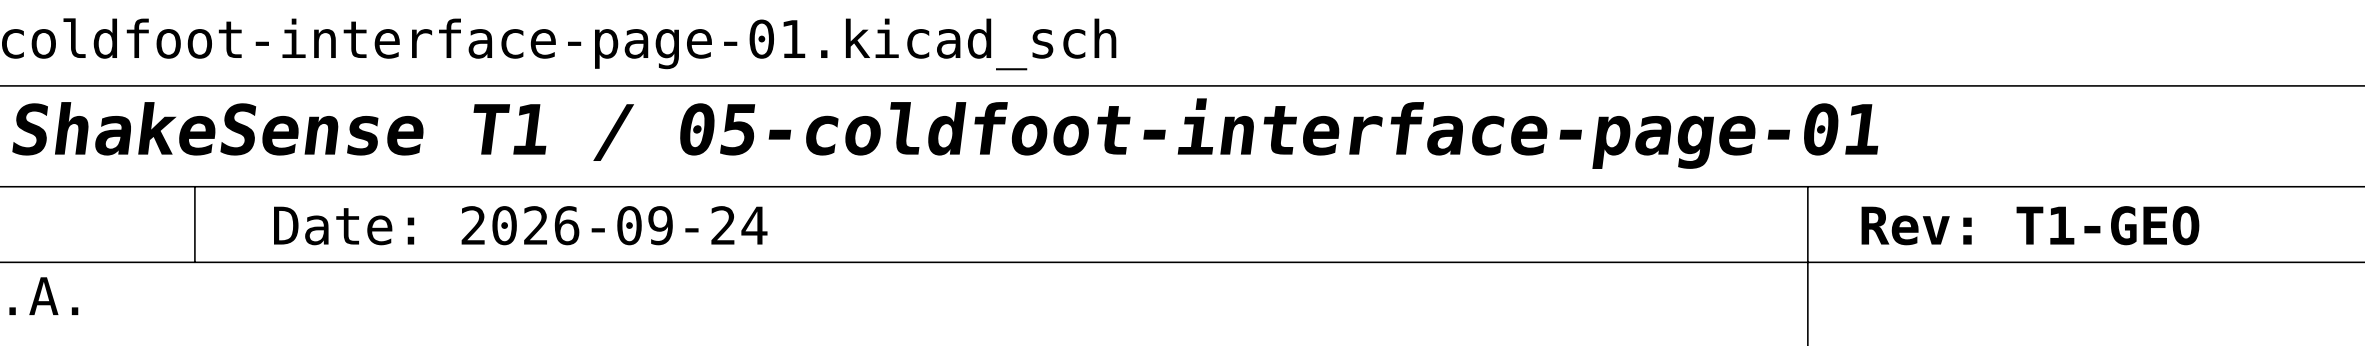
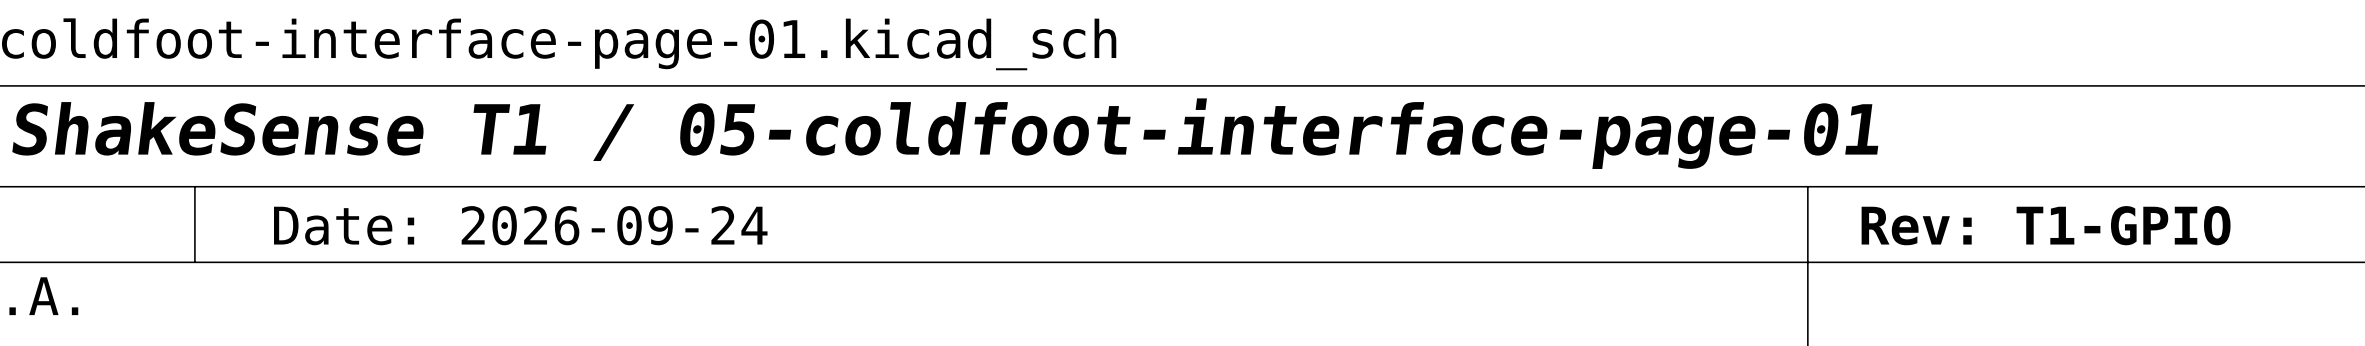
title block: Rev: T1-GEO (2030, 225) -> Rev: T1-GPIO (2046, 225)

